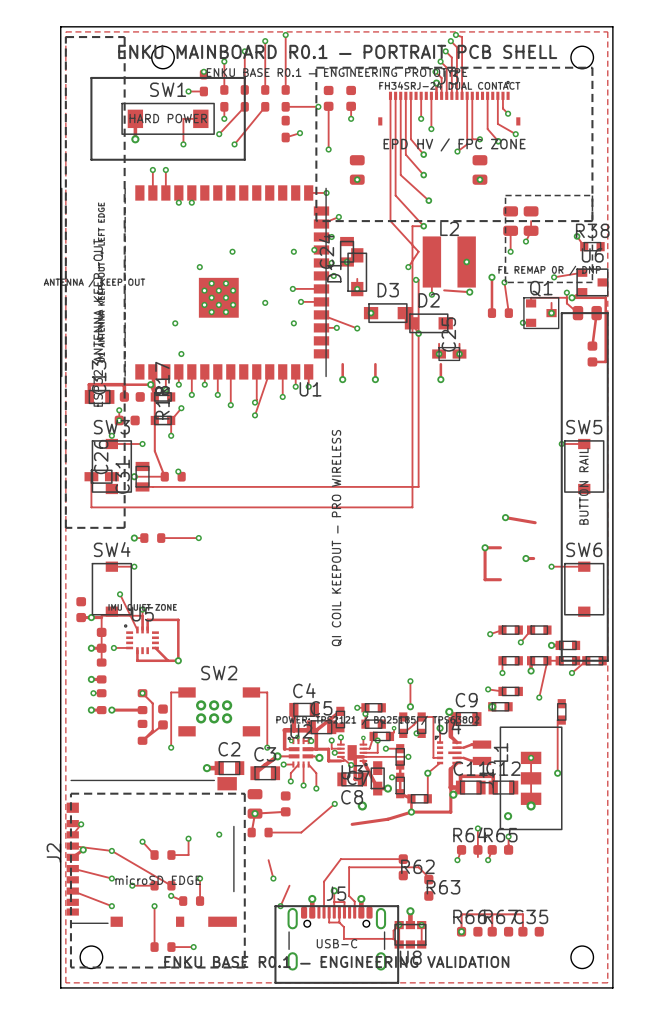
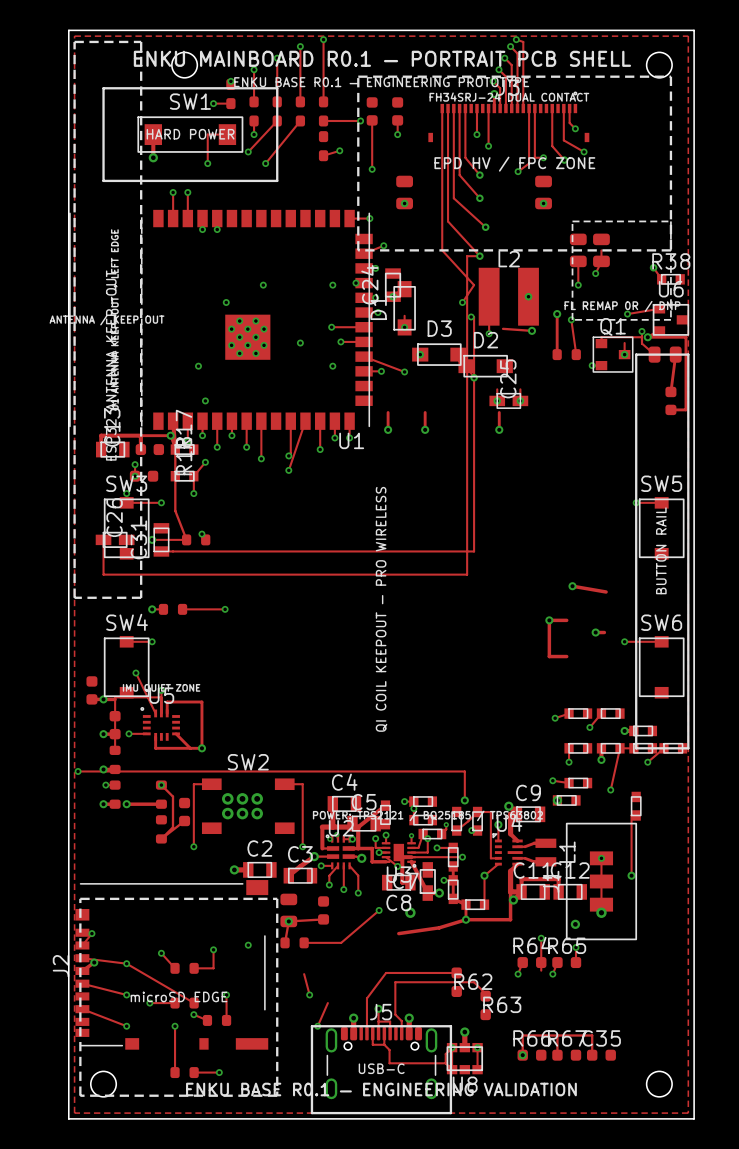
track: none -> (78, 771) (464, 771)
via: none -> (78, 771)
via: (410, 681) -> none

